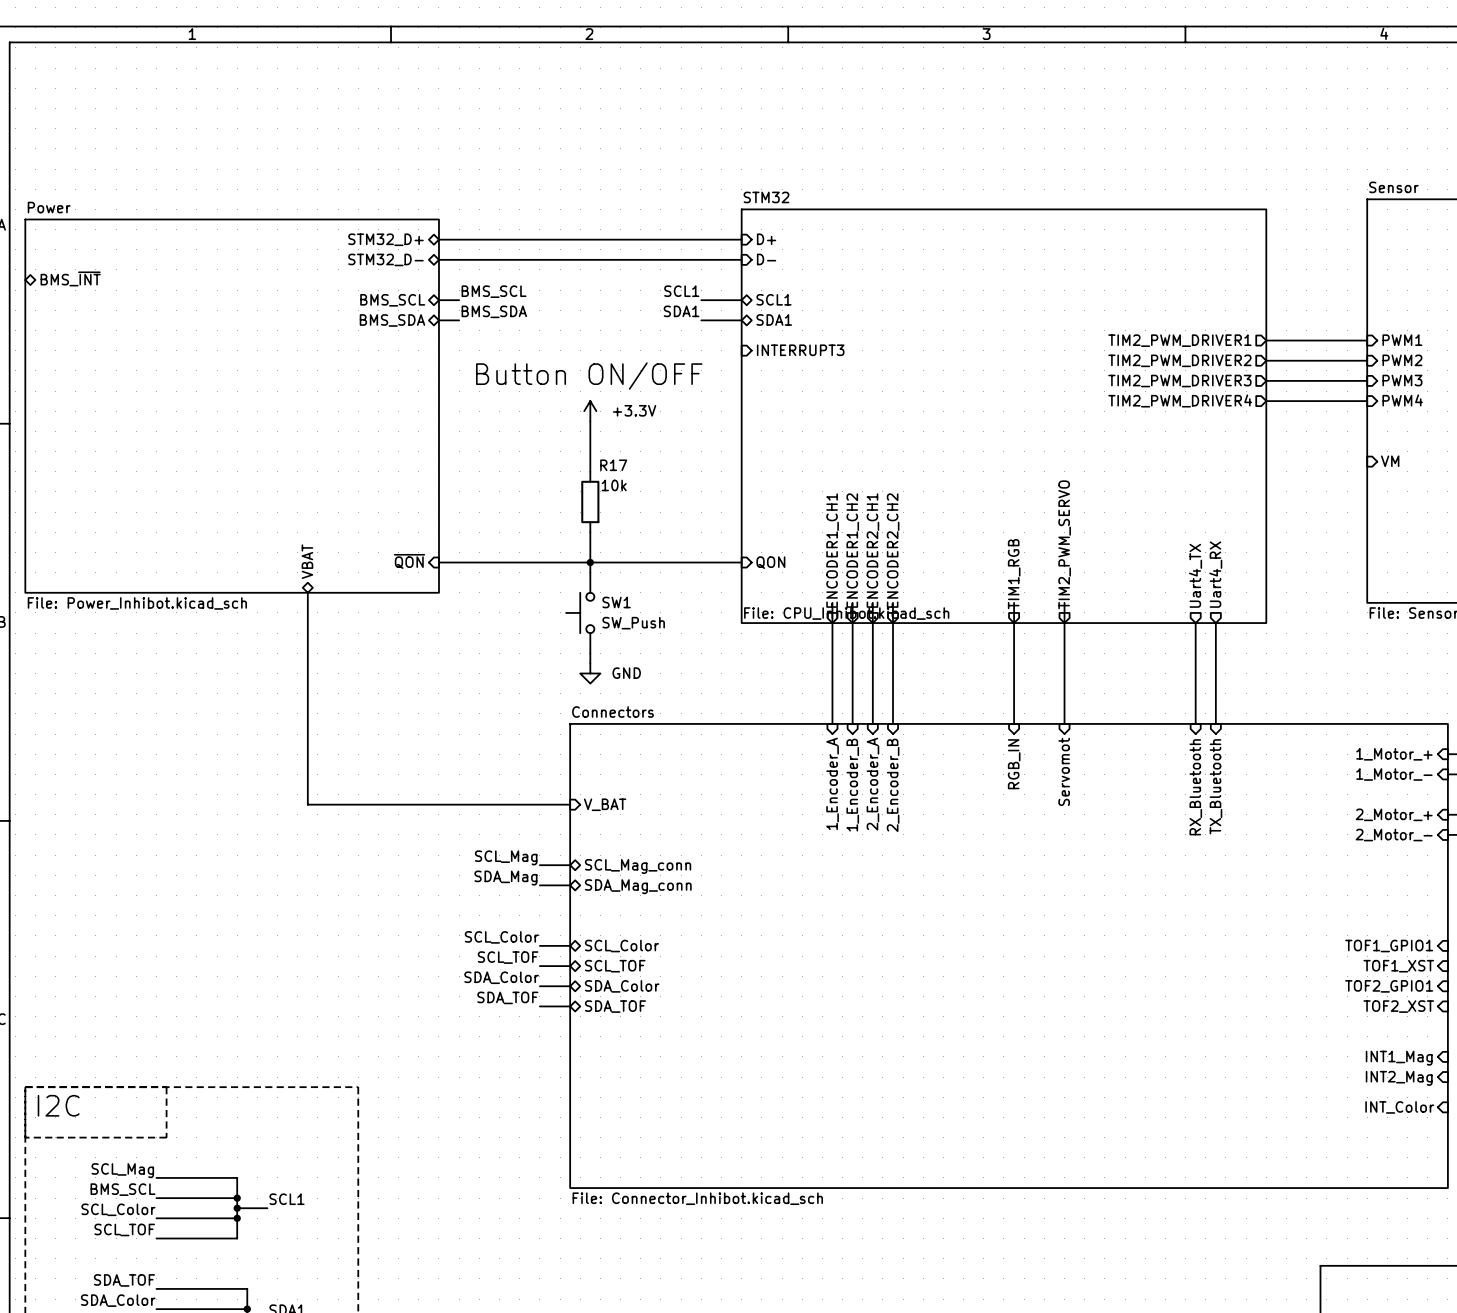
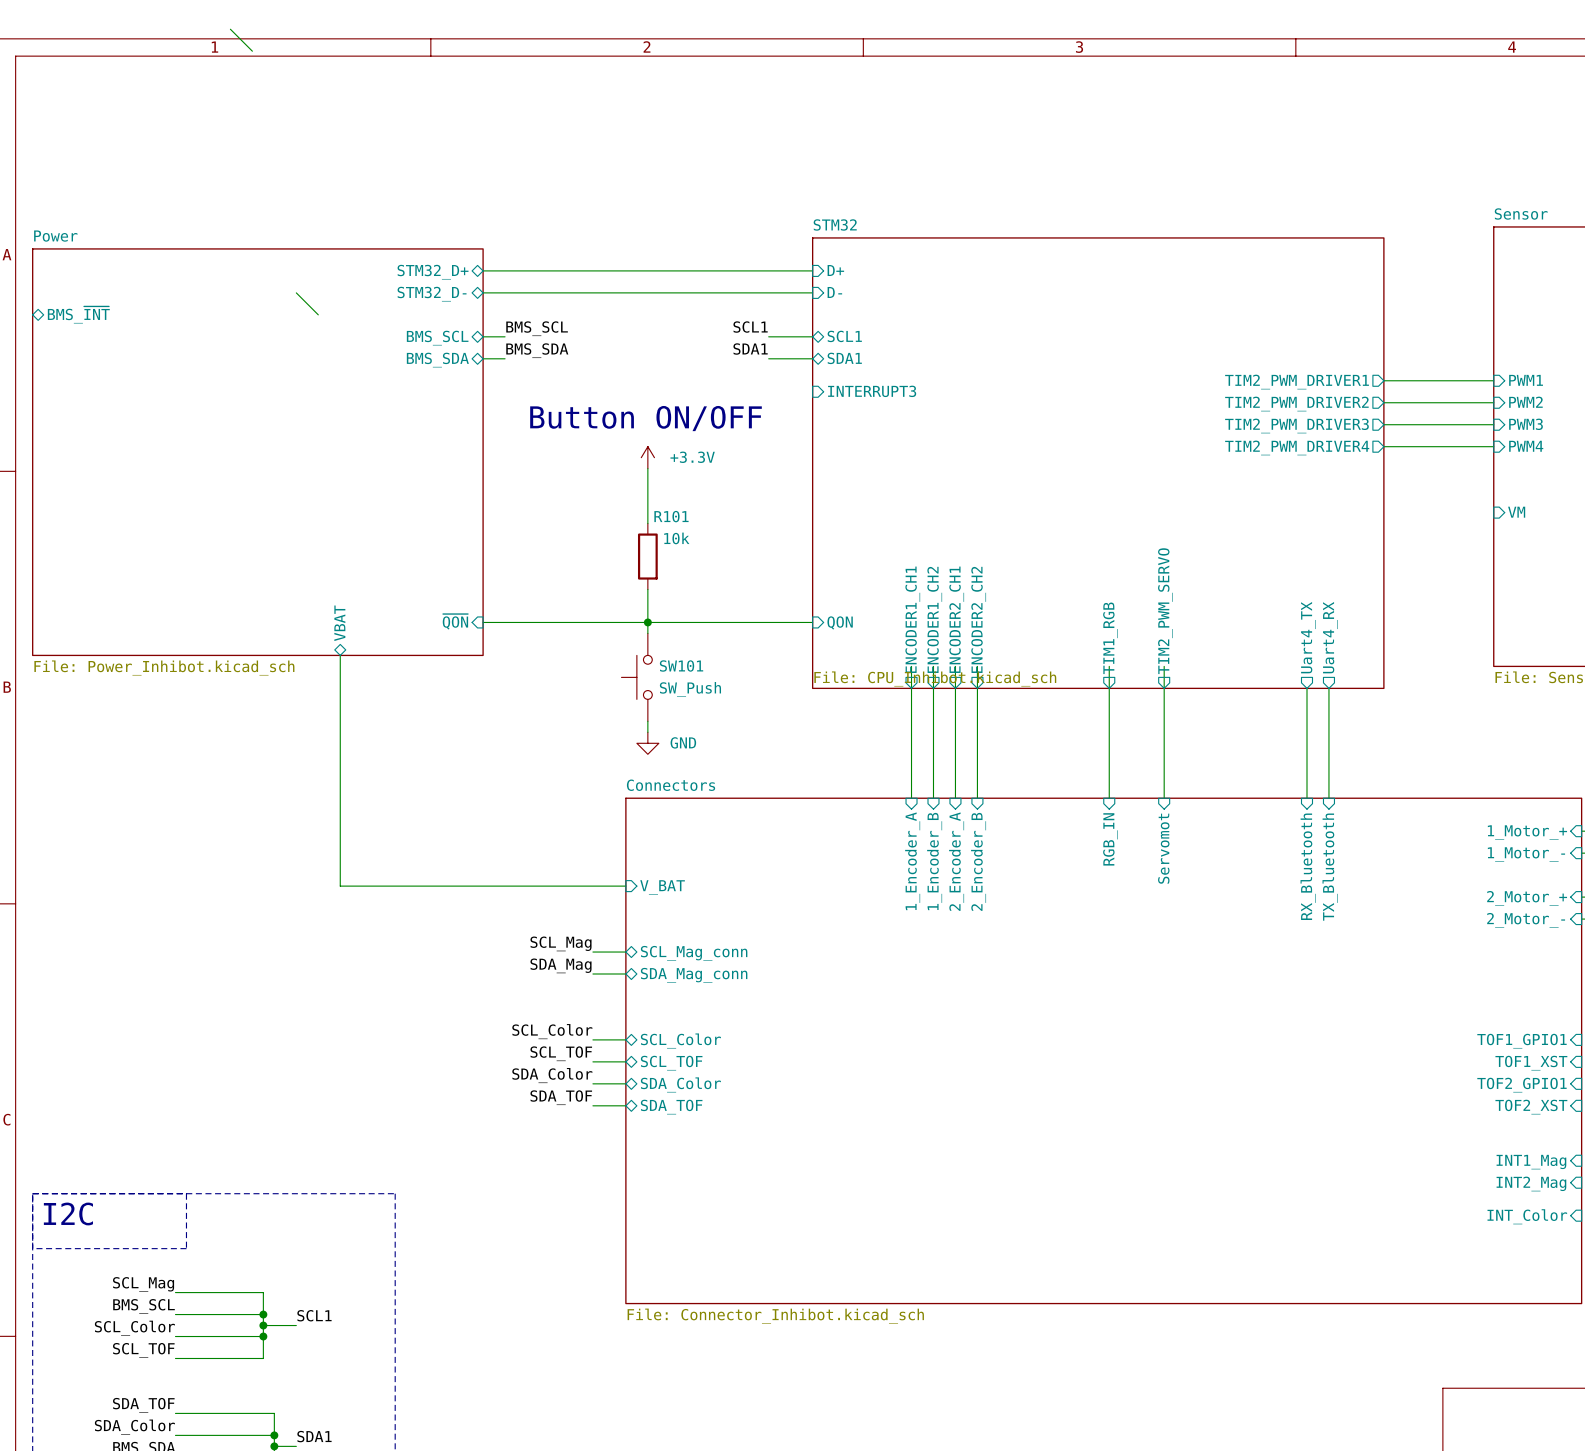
wire: none -> (230, 29) (252, 51)
wire: none -> (296, 292) (318, 314)
R17 name: R17 (613, 465) -> R101 (671, 516)
SW1 name: SW1 (616, 602) -> SW101 (681, 665)

